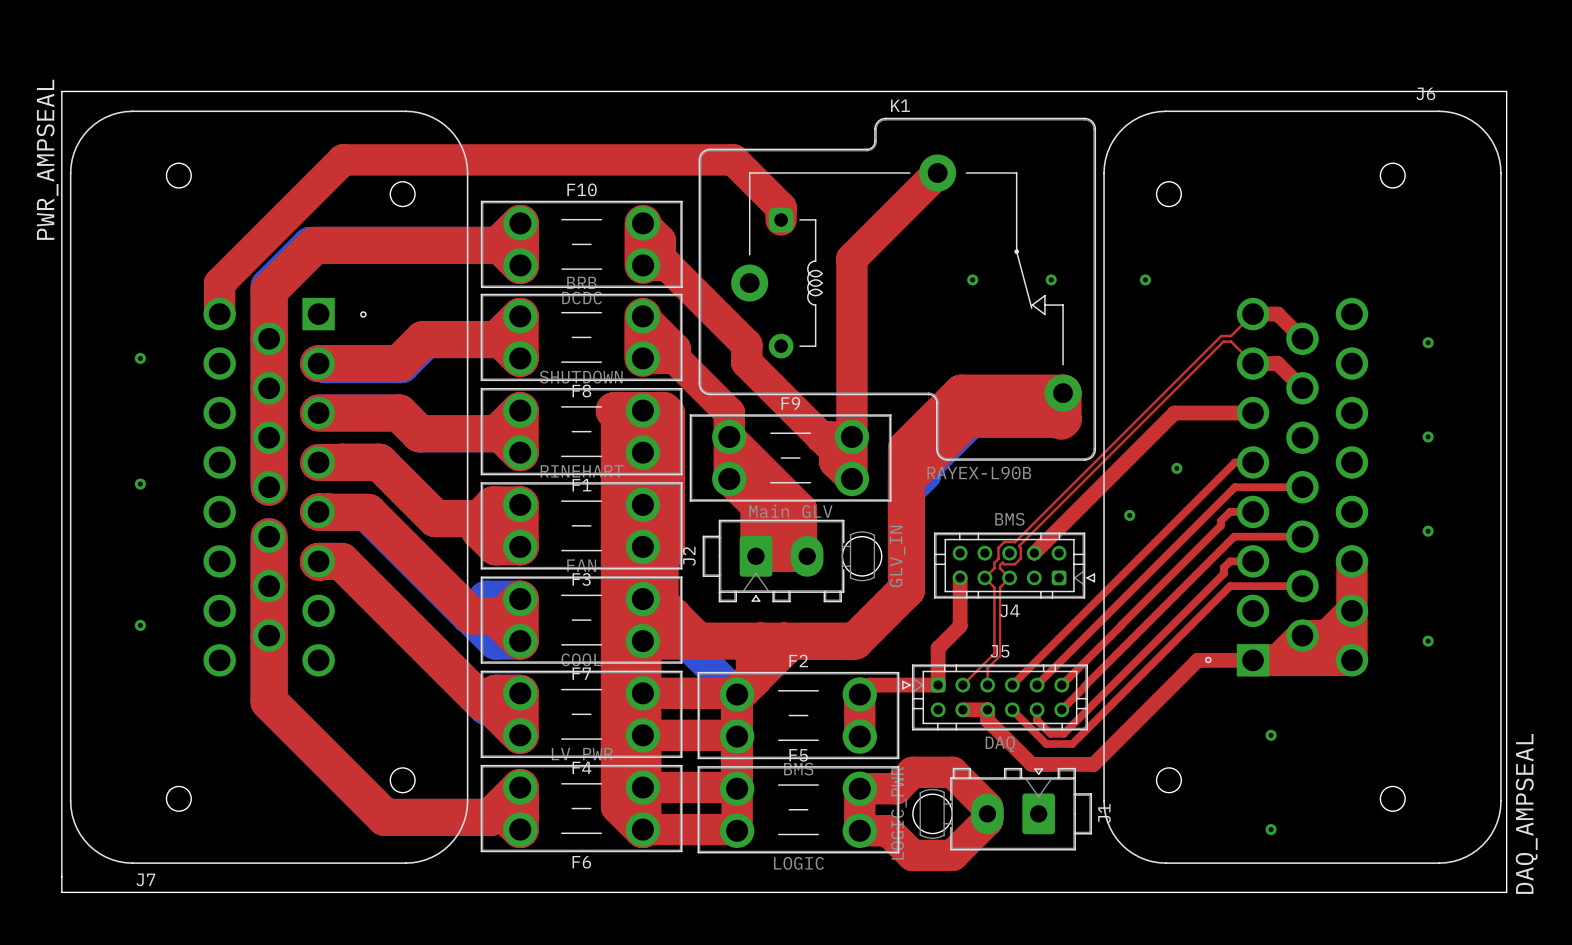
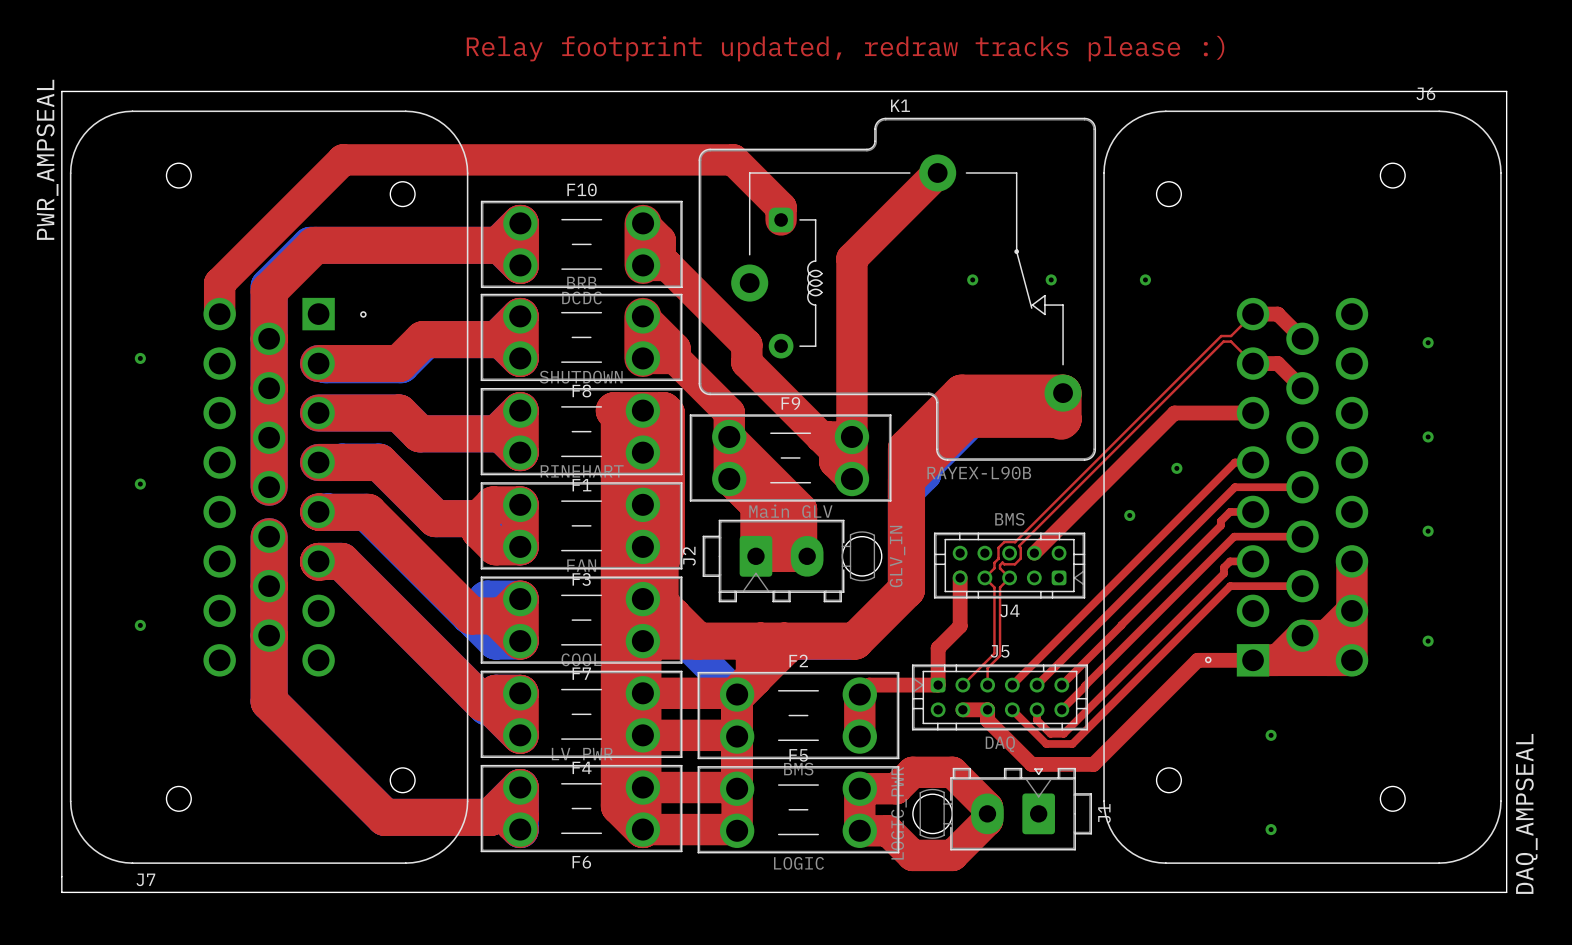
text: none -> Relay footprint updated, redraw tracks please :) (845, 48)
J2 footprint: [702, 519, 882, 603] -> [702, 519, 882, 603]
J4 footprint: [933, 532, 1096, 599] -> [933, 532, 1086, 599]
J5 footprint: [902, 664, 1089, 731] -> [911, 664, 1089, 731]

